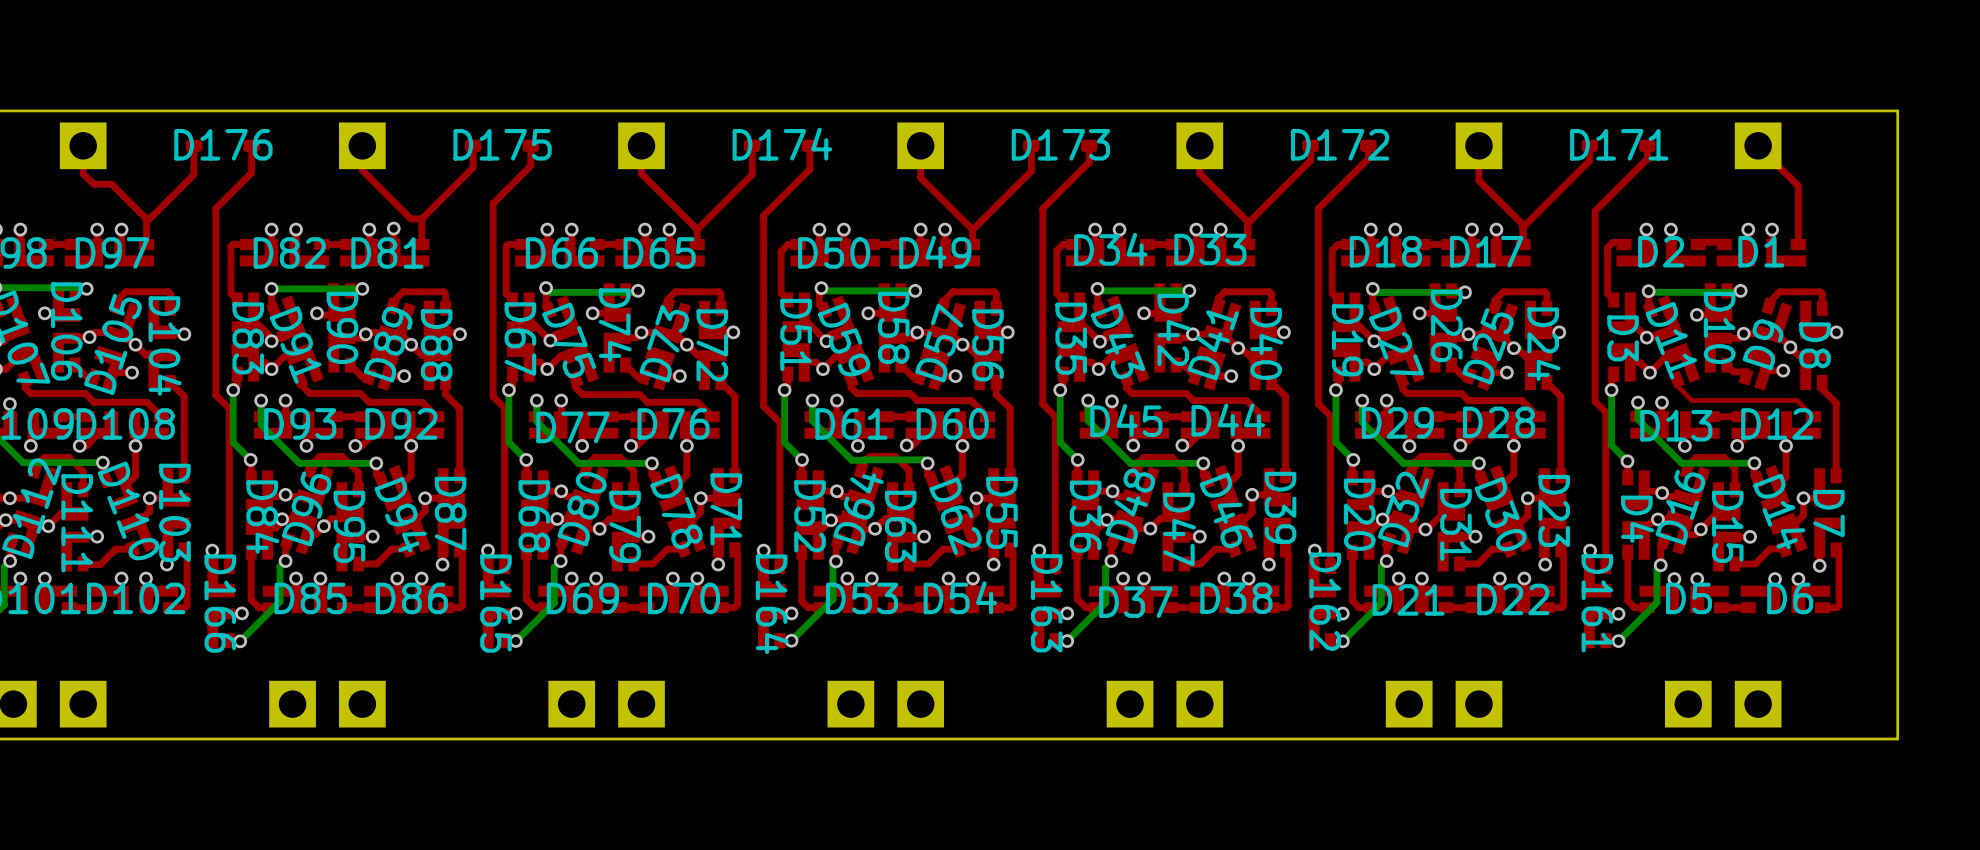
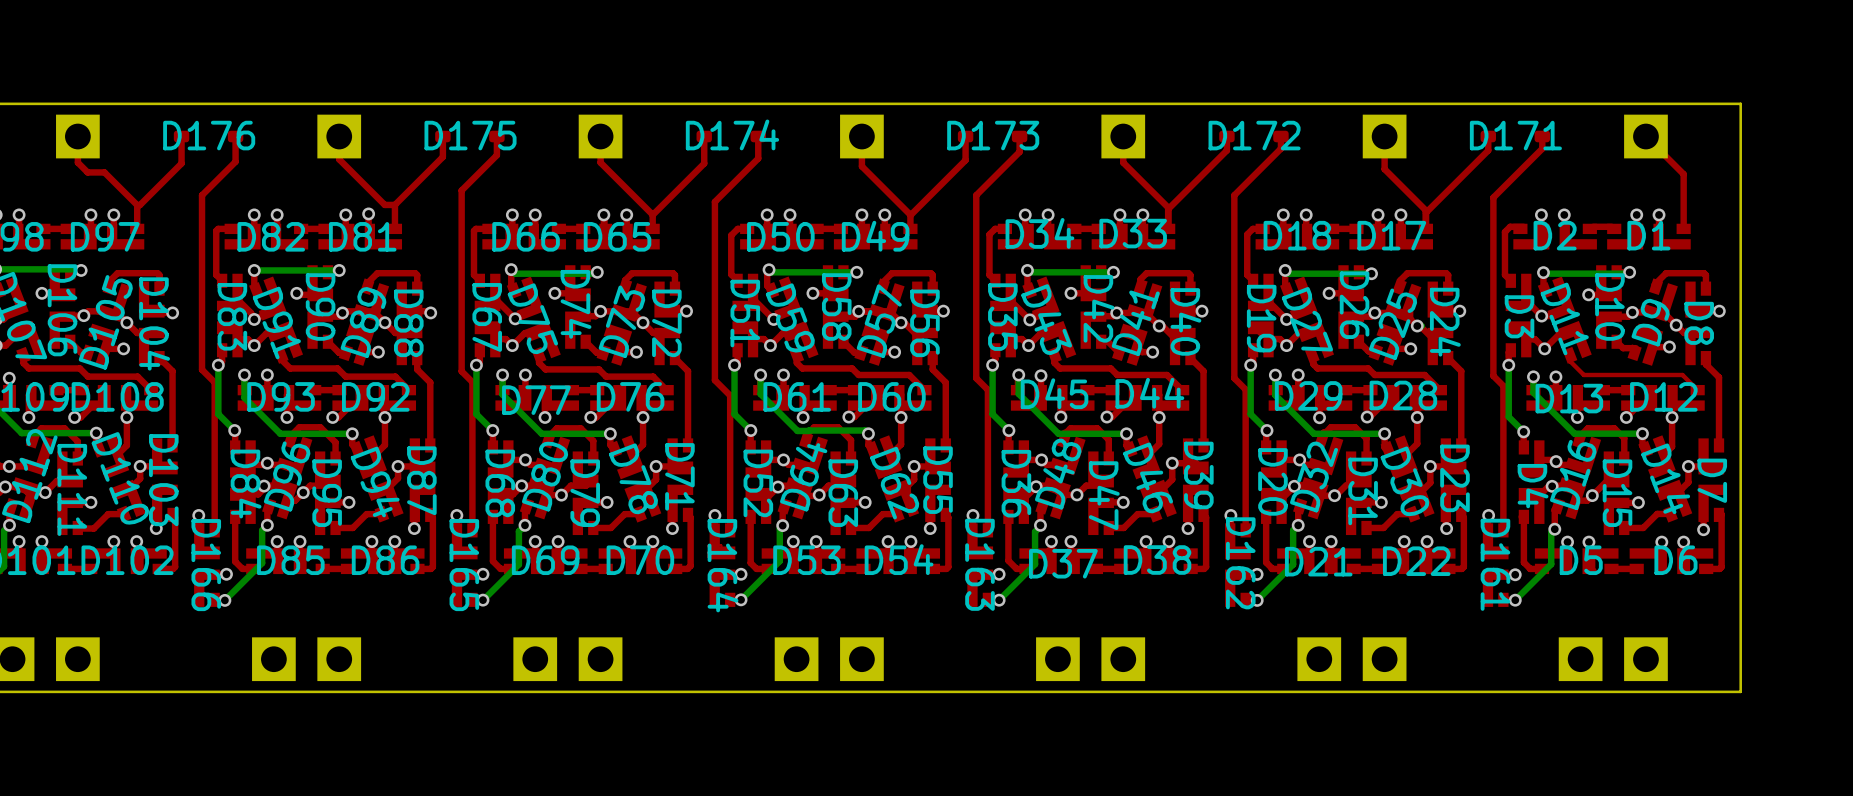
board edge: (1859, 110) (1897, 110) (1897, 739) (1859, 739) -> (1740, 103) (1740, 691)

